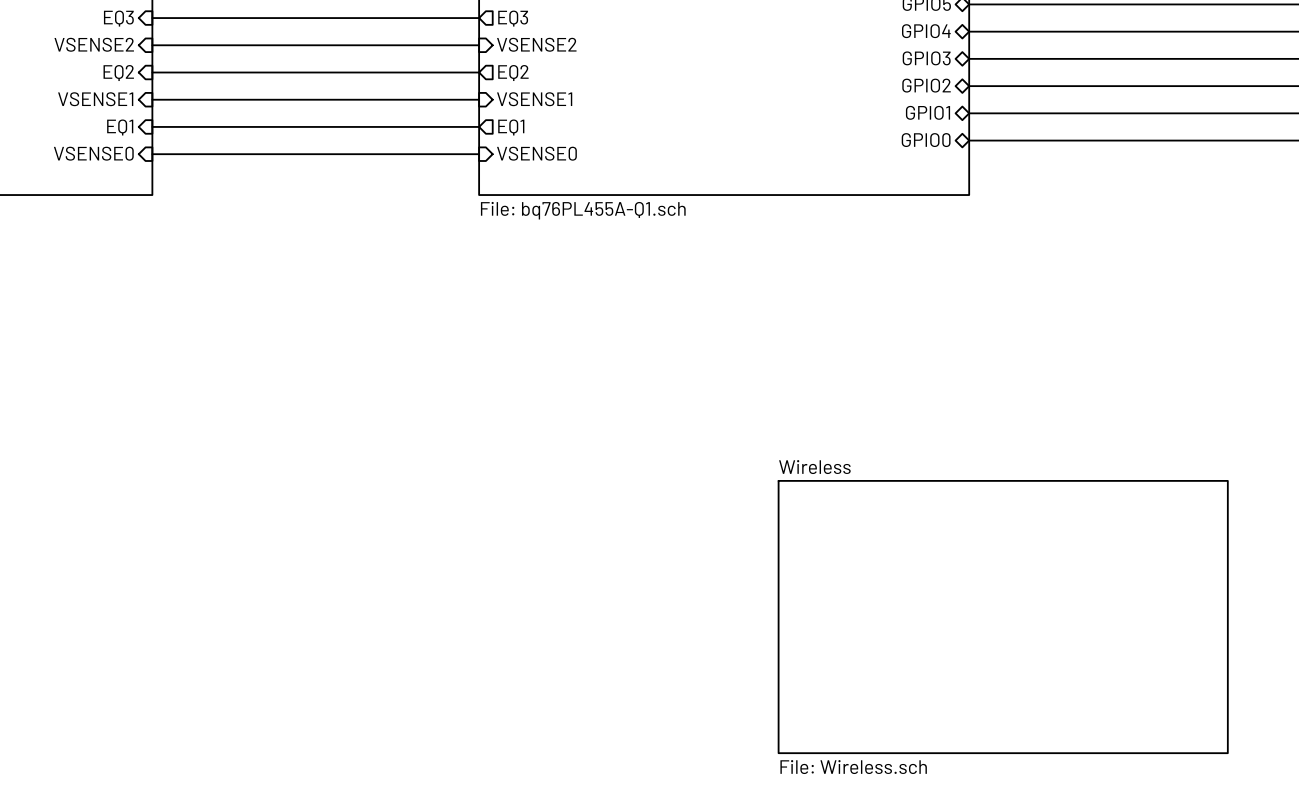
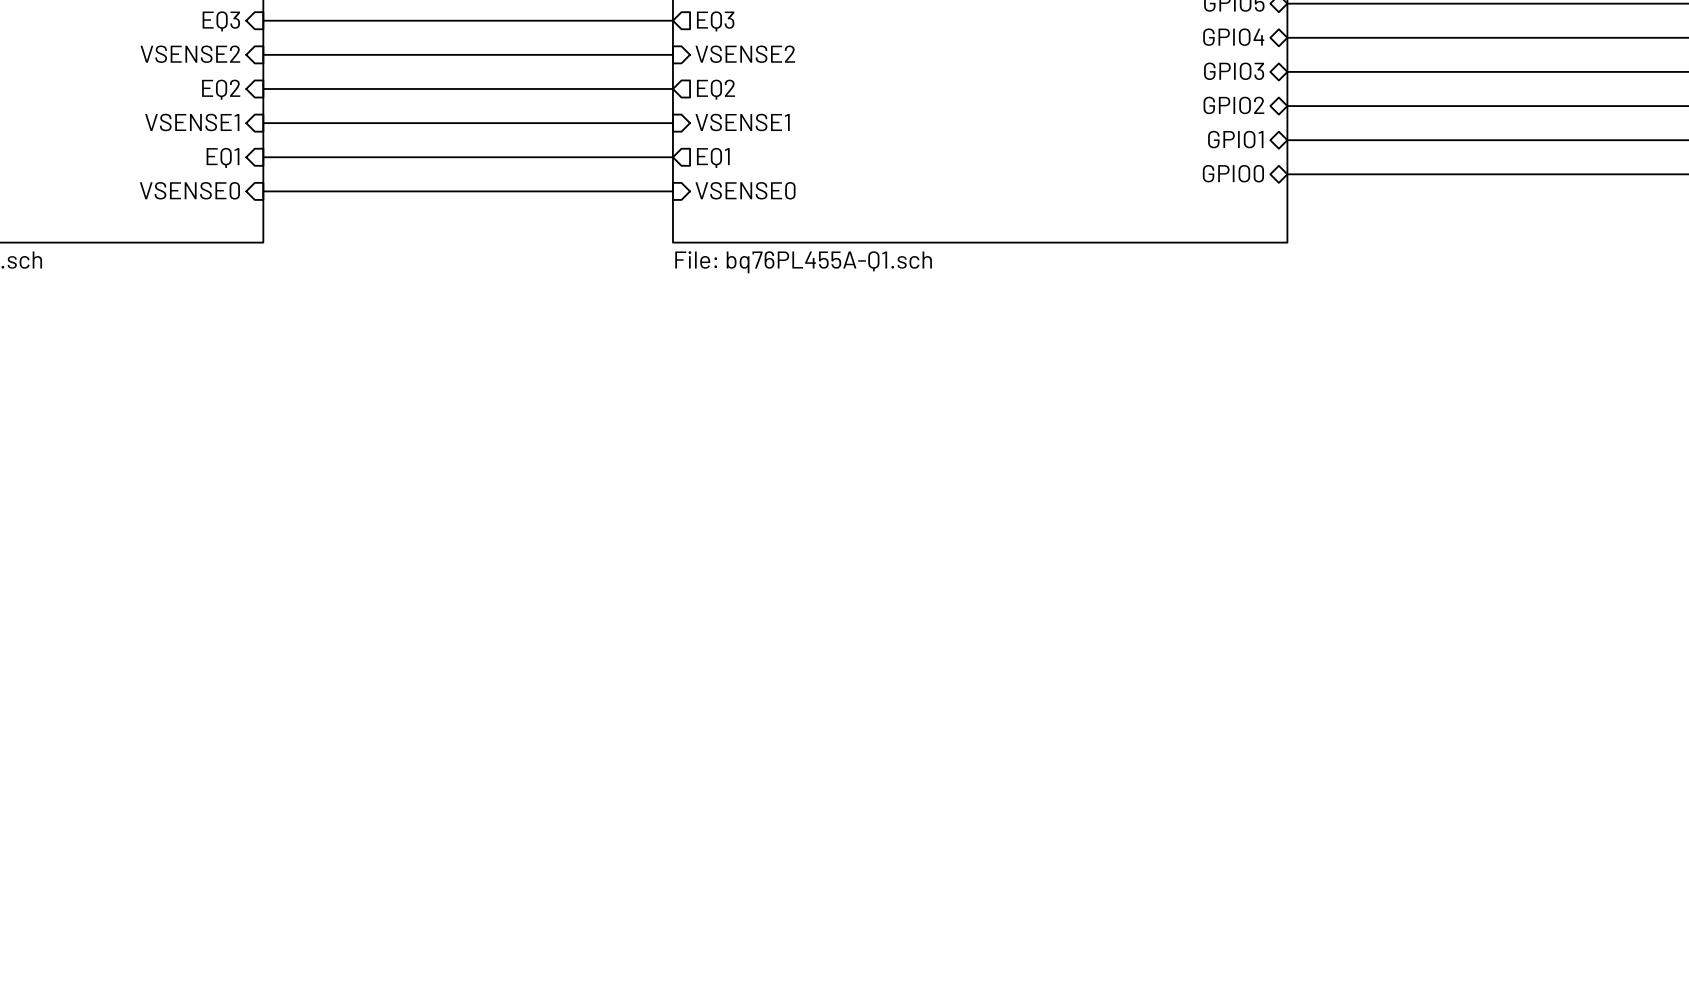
sheet Wireless: File: Wireless.sch (1003, 617) -> none

